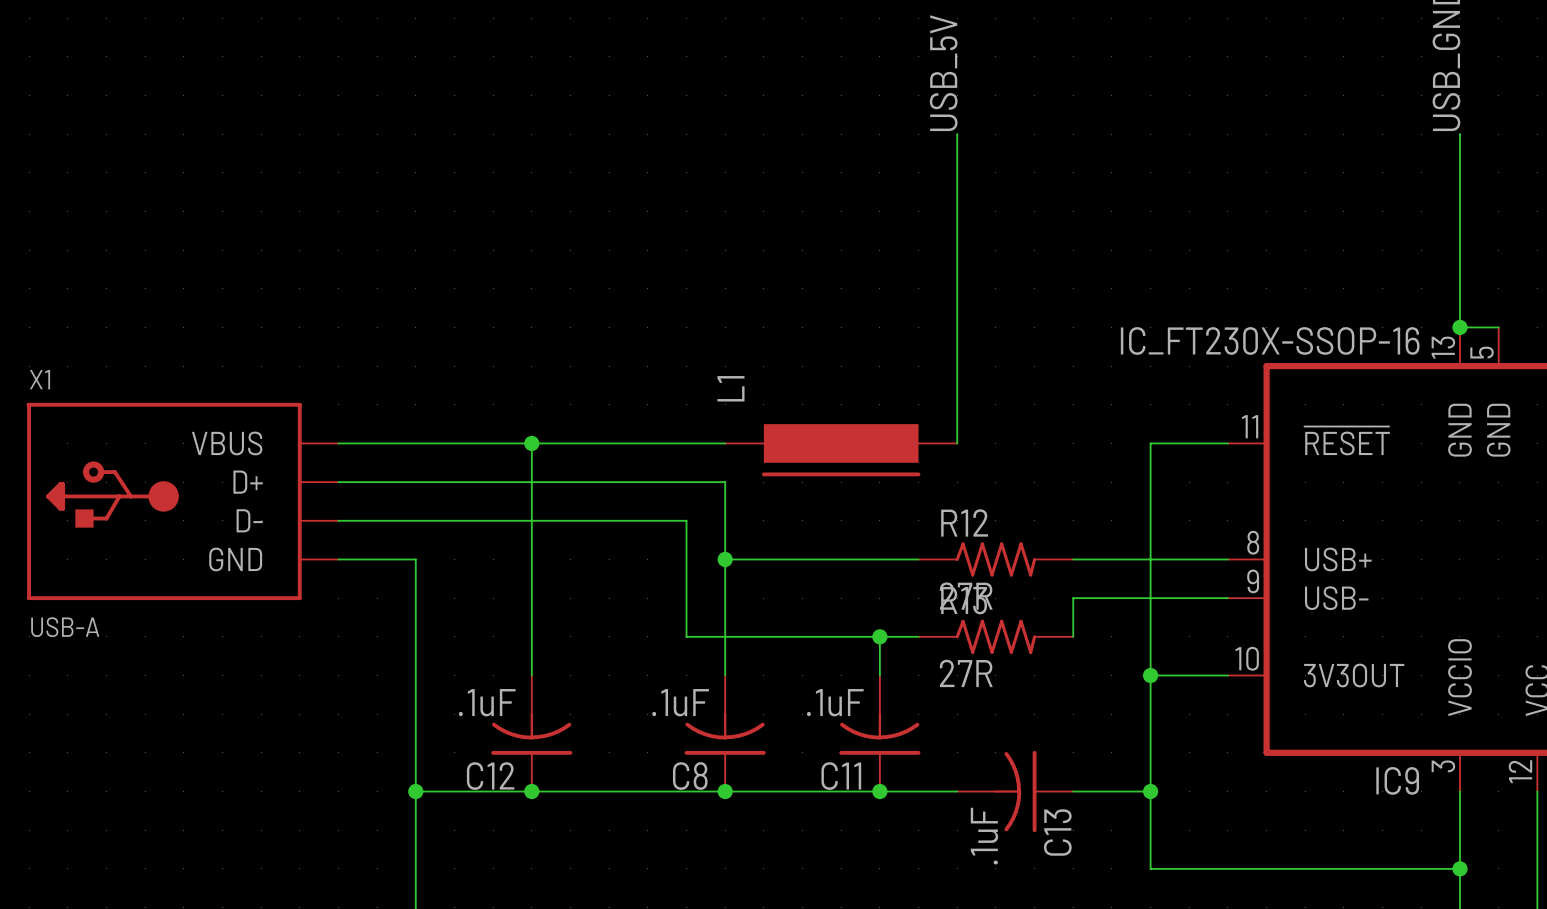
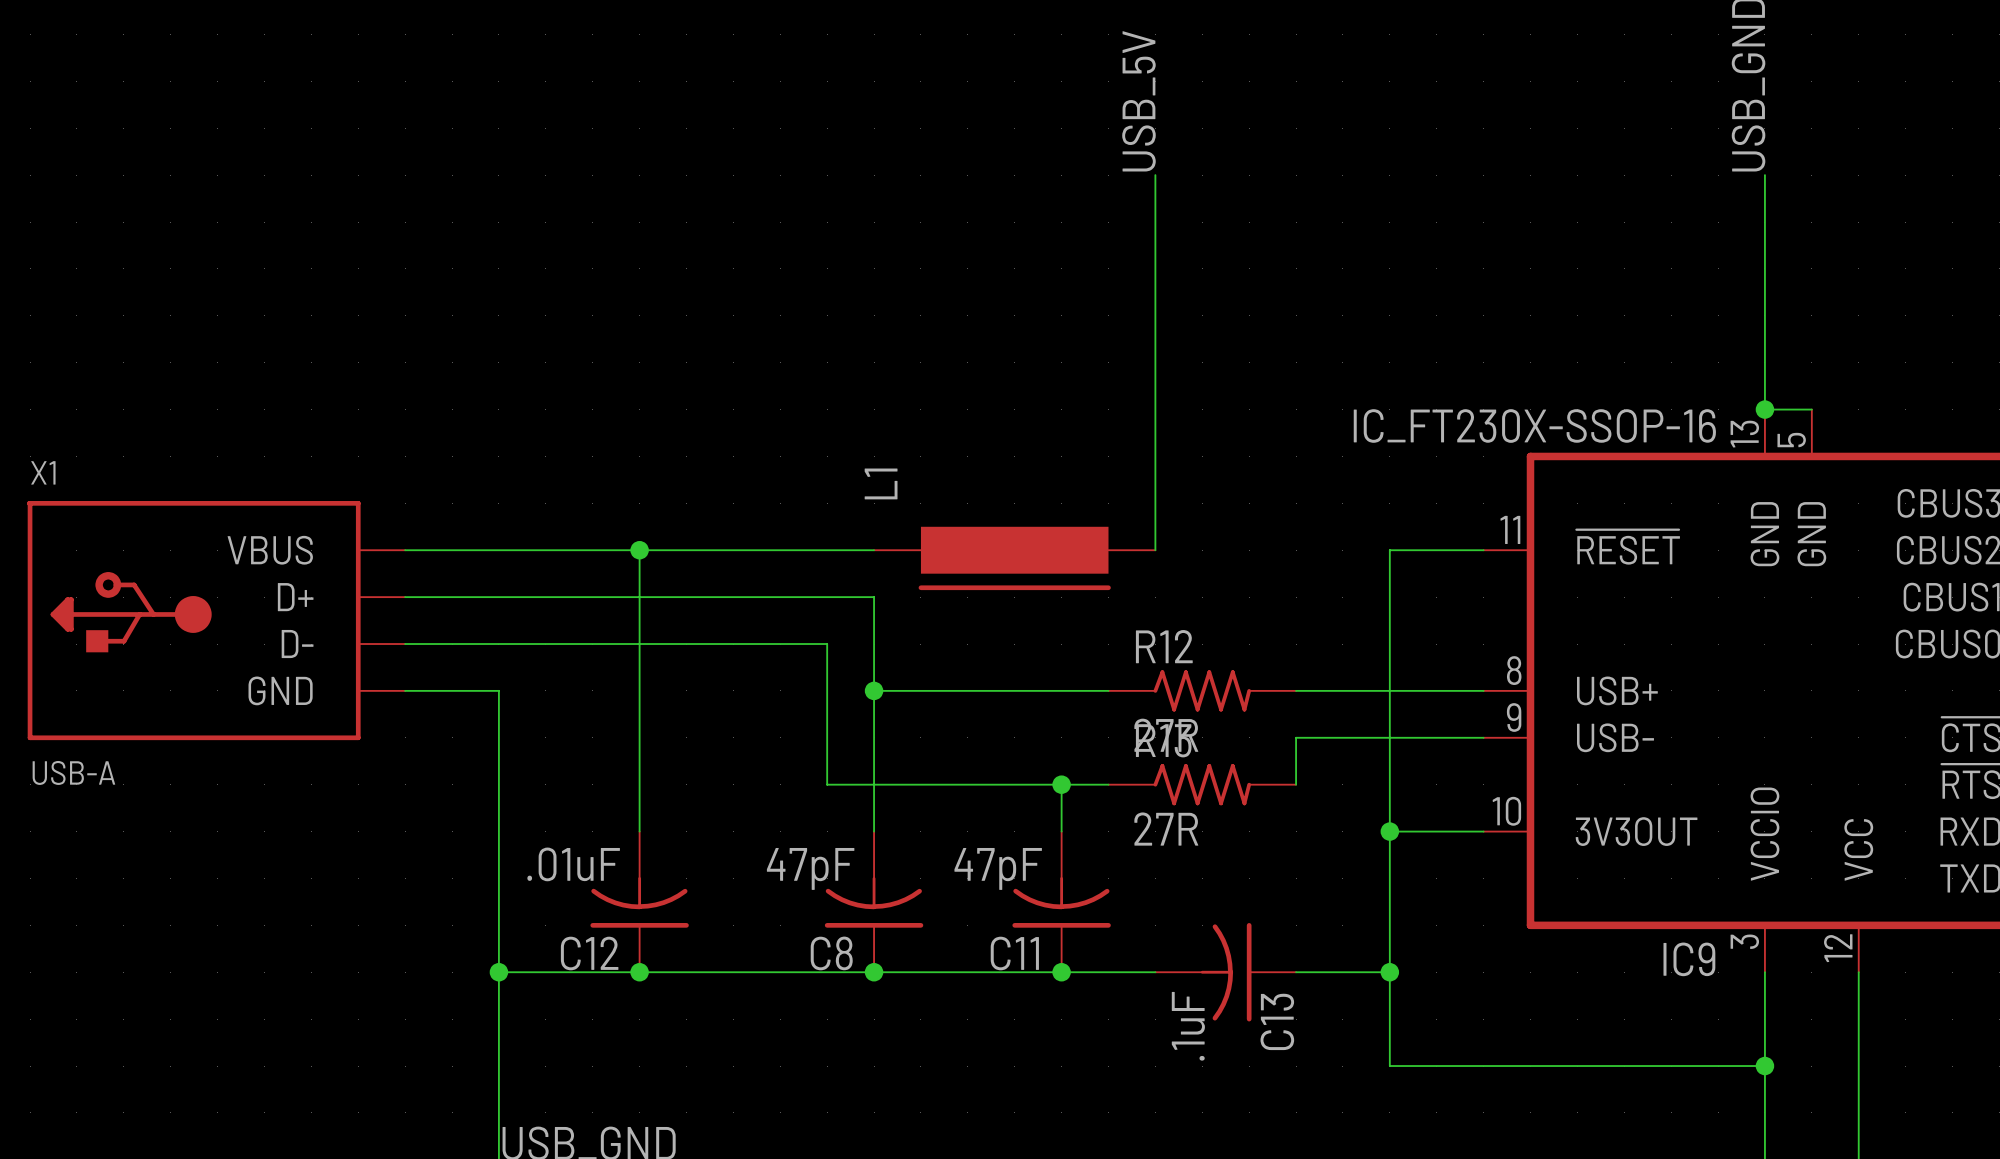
C12 value: .1uF (487, 702) -> .01uF (573, 864)
C8 value: .1uF (680, 702) -> 47pF (810, 868)
C11 value: .1uF (835, 702) -> 47pF (998, 868)

